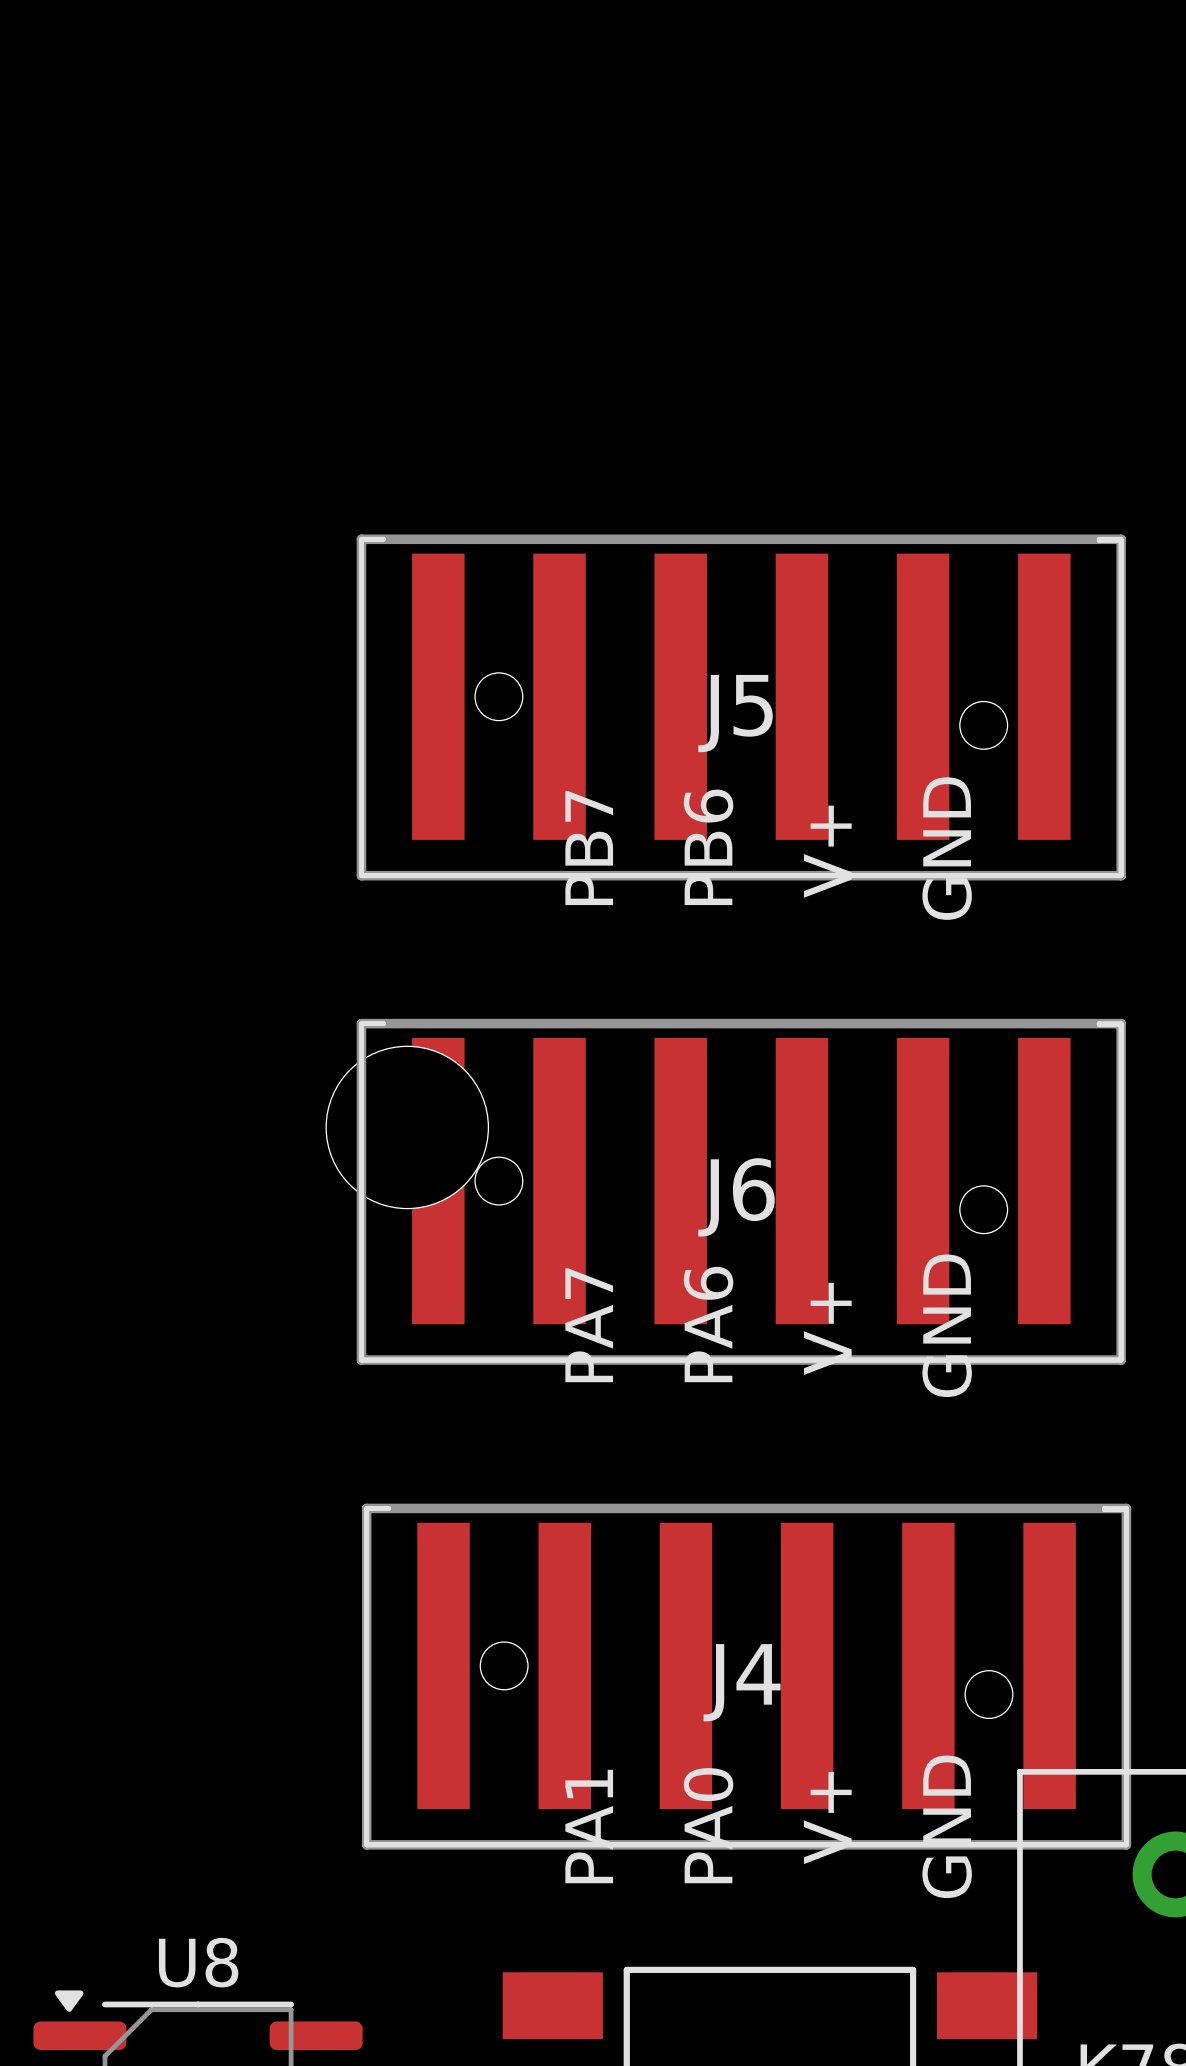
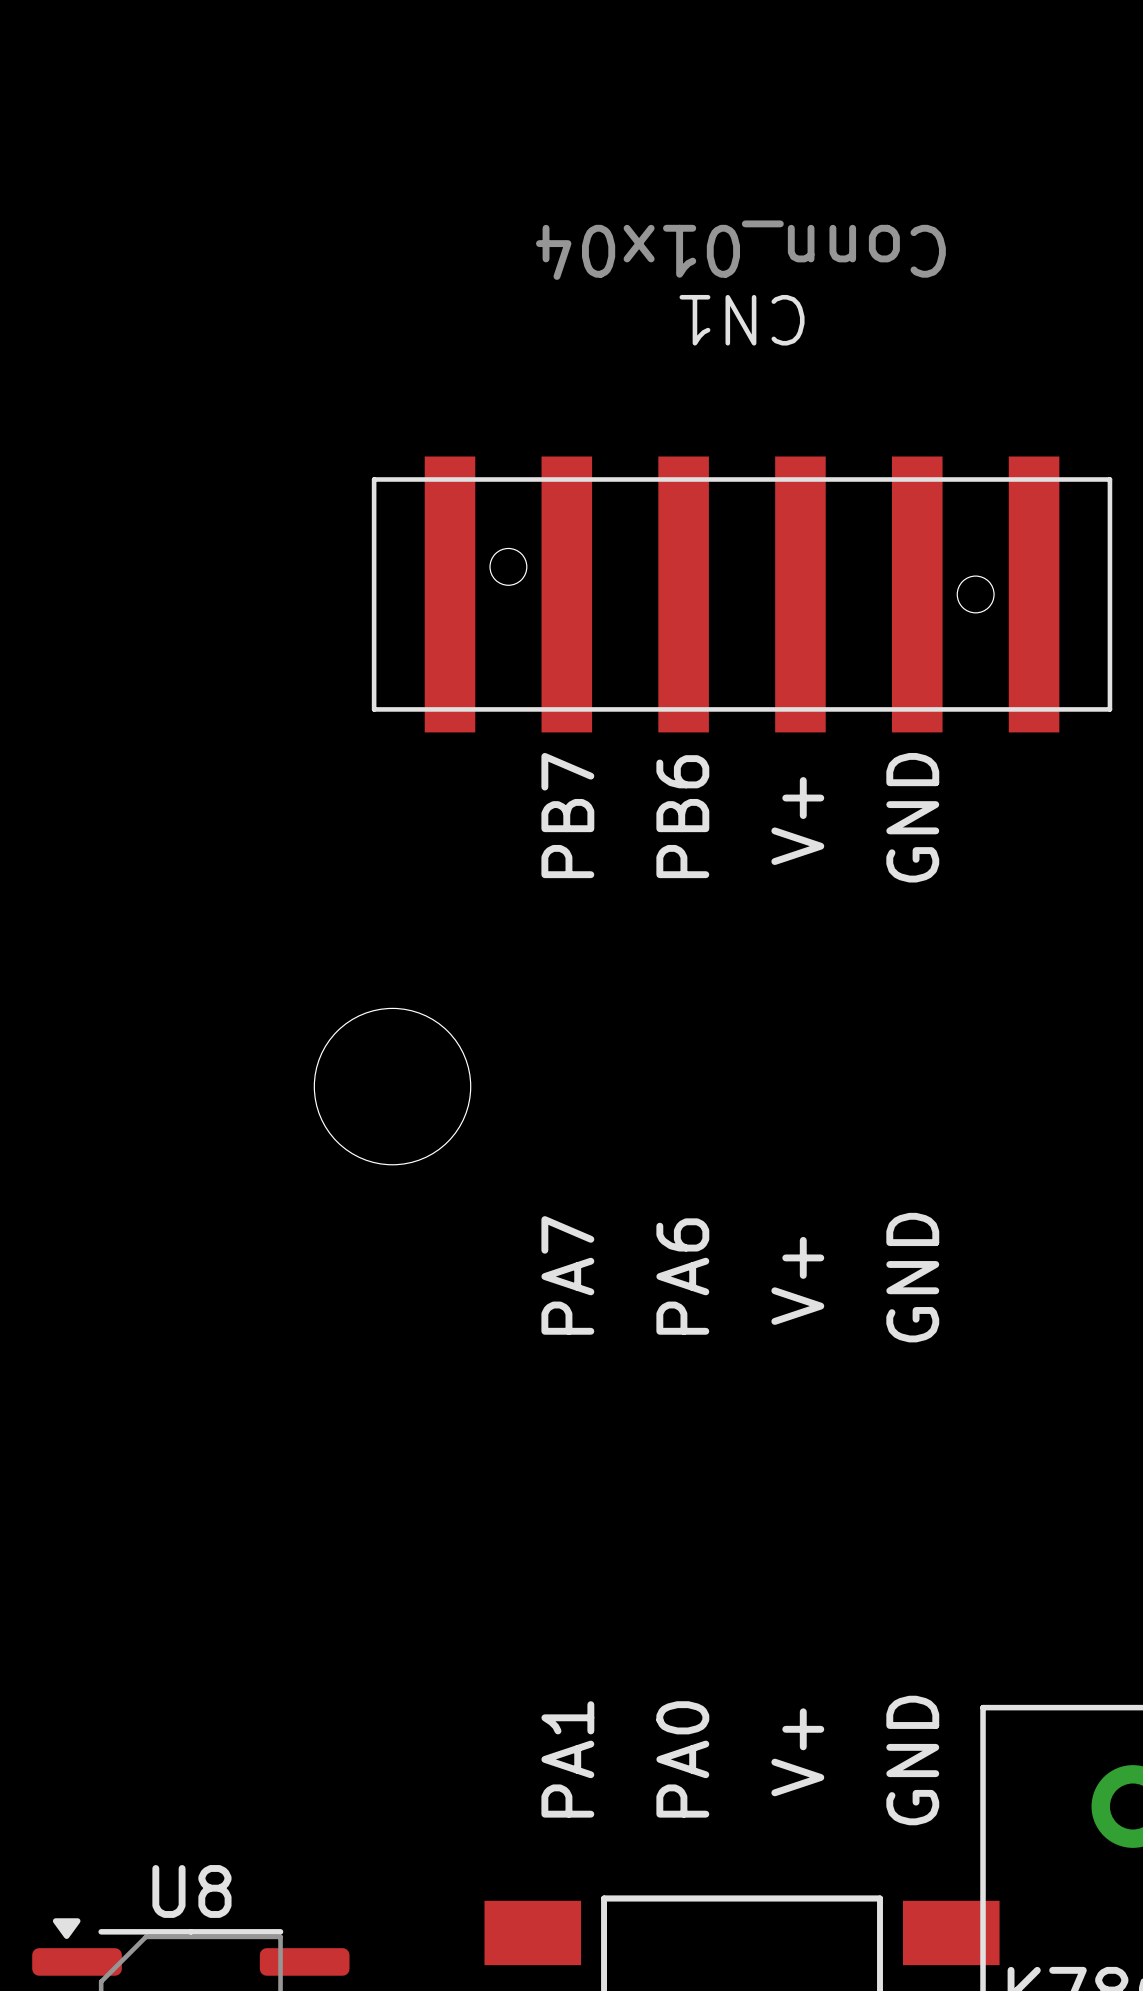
CN1: none -> Conn_01x04 (742, 594)
J5: (741, 707) -> none
J6: (741, 1191) -> none
J4: (746, 1676) -> none

